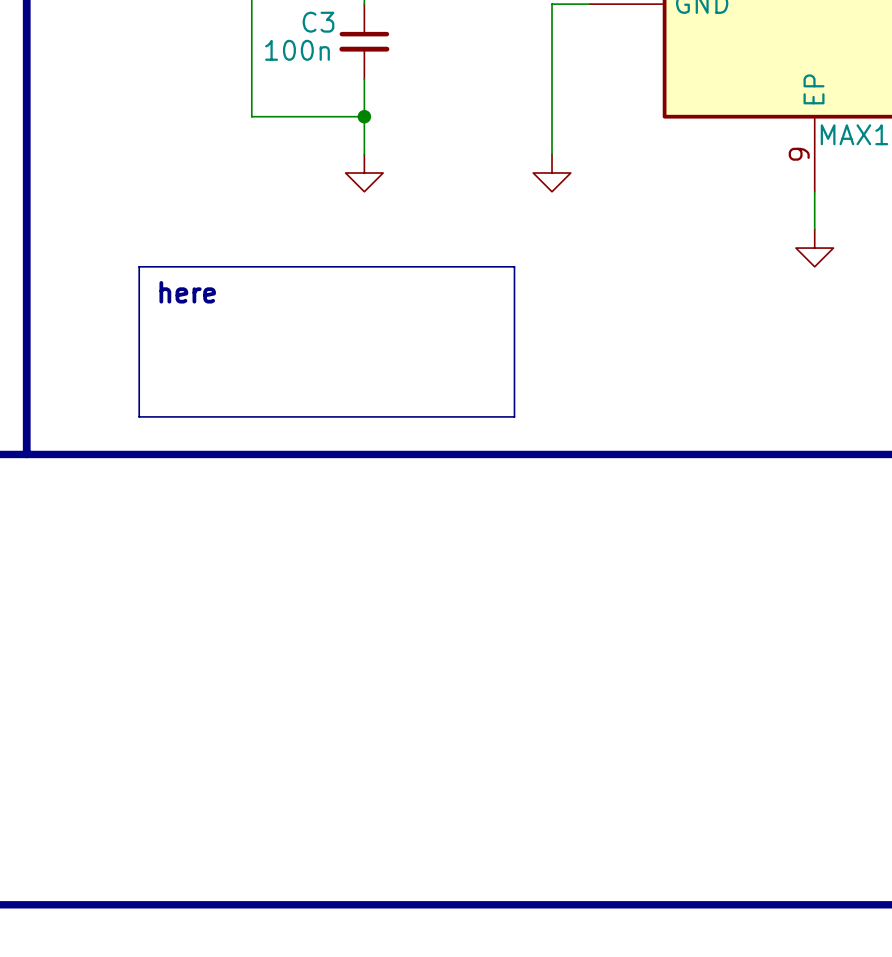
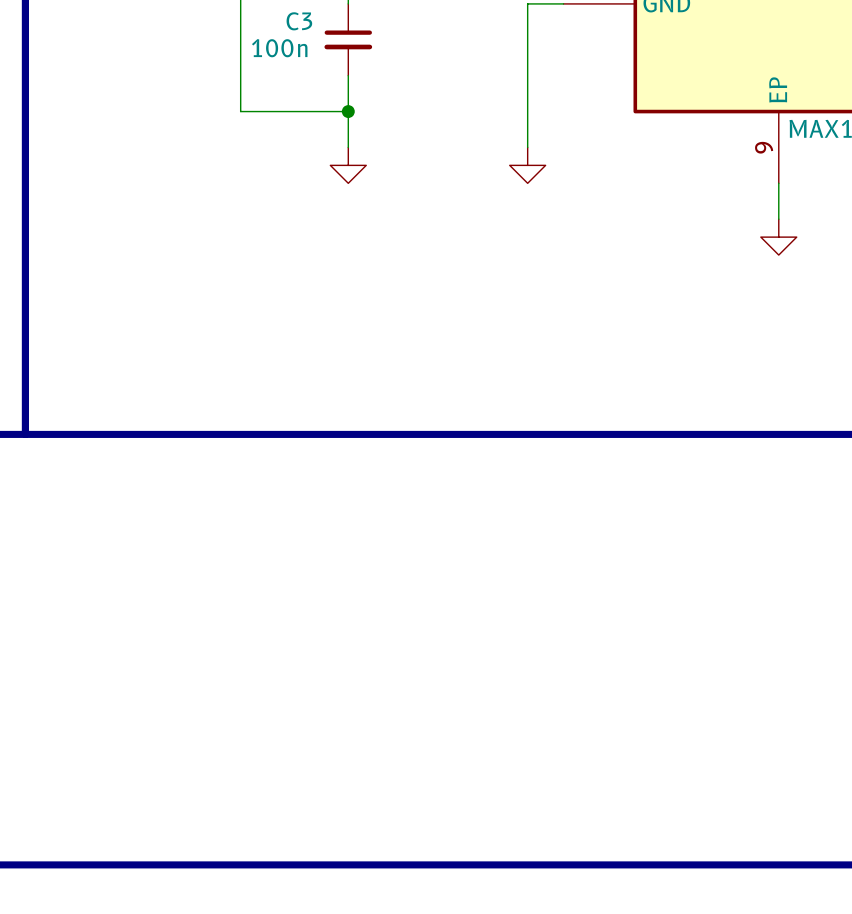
line: (139, 266) (514, 266) (514, 416) (139, 416) (139, 266) -> none
text: here (187, 292) -> none

